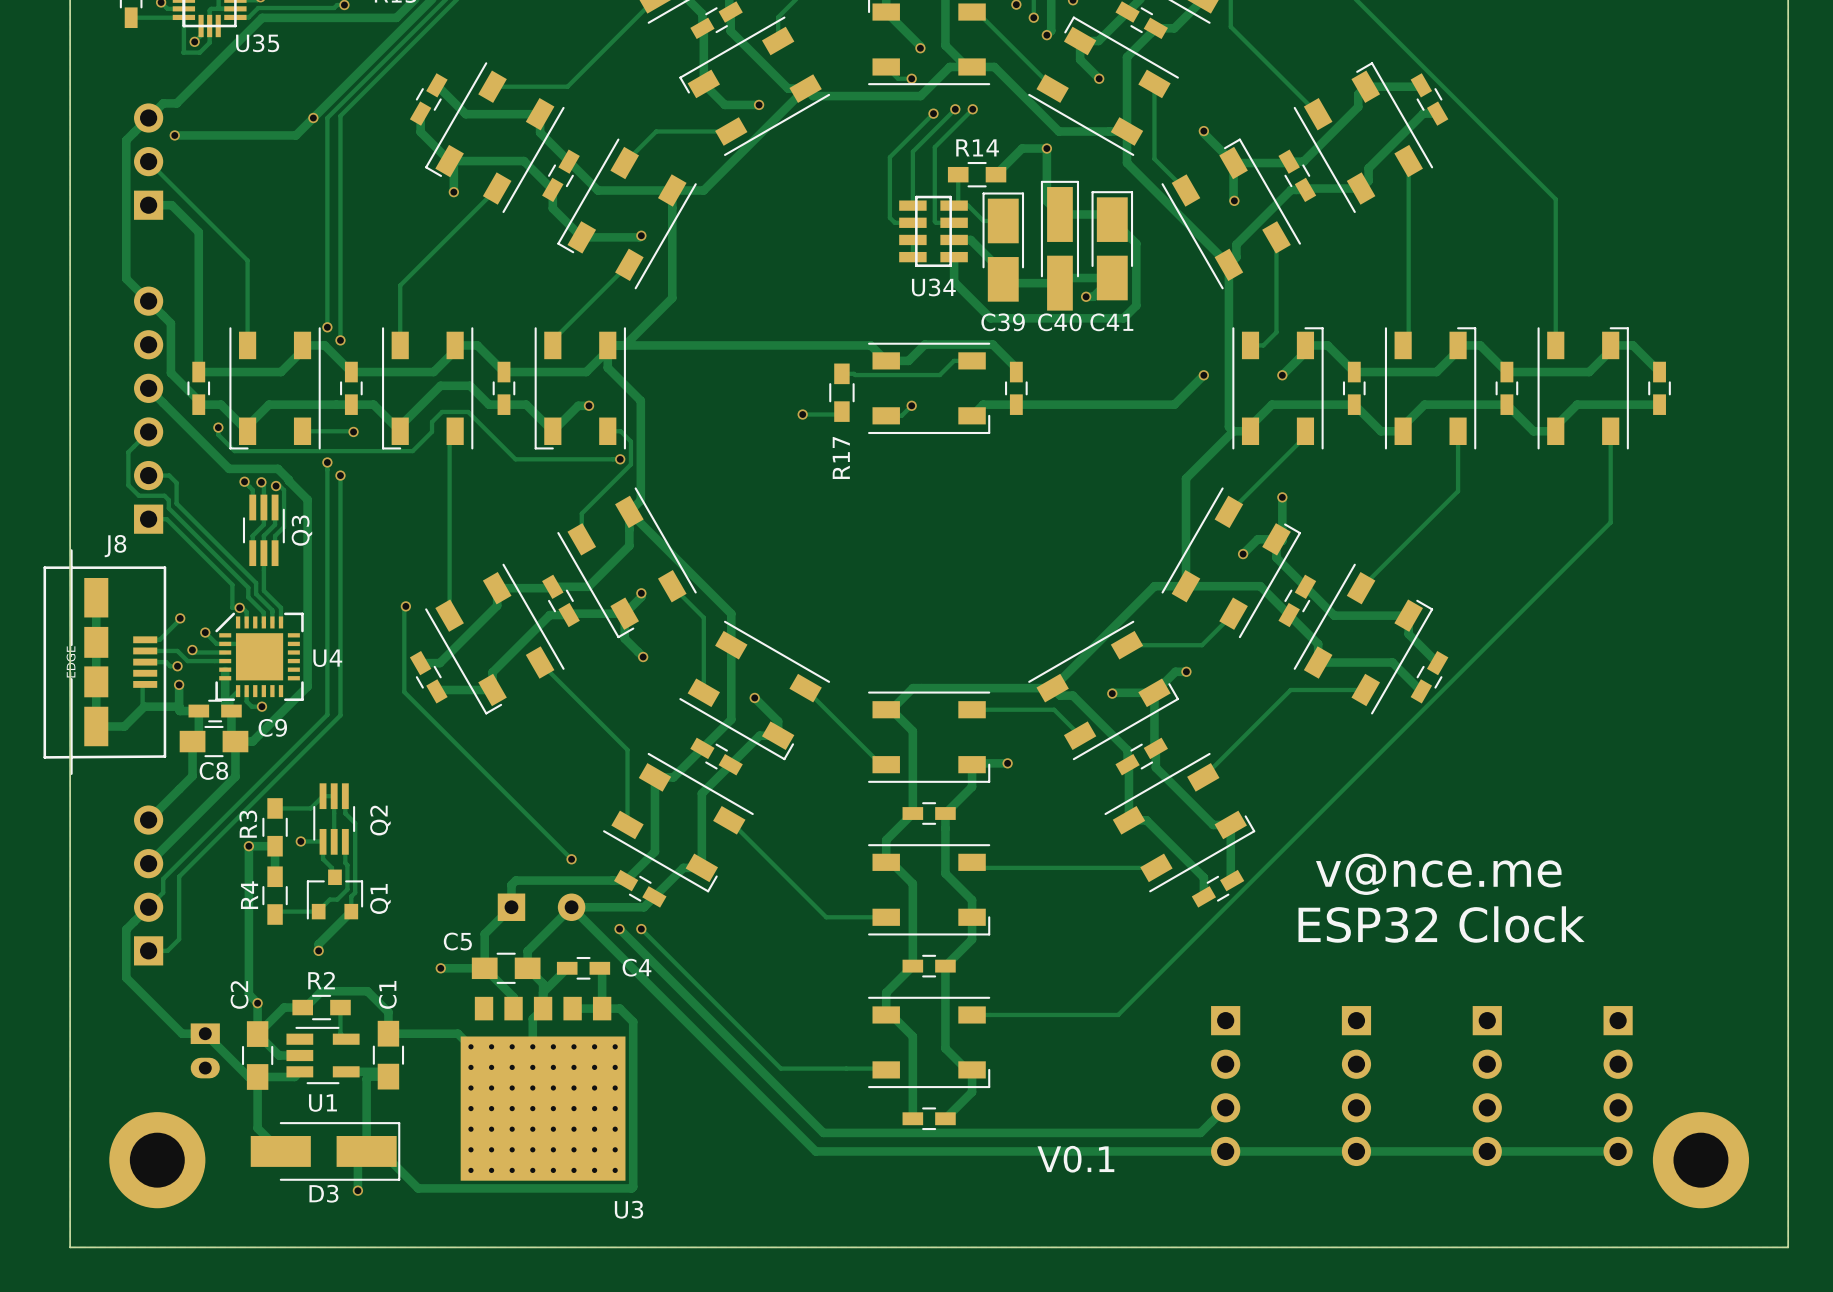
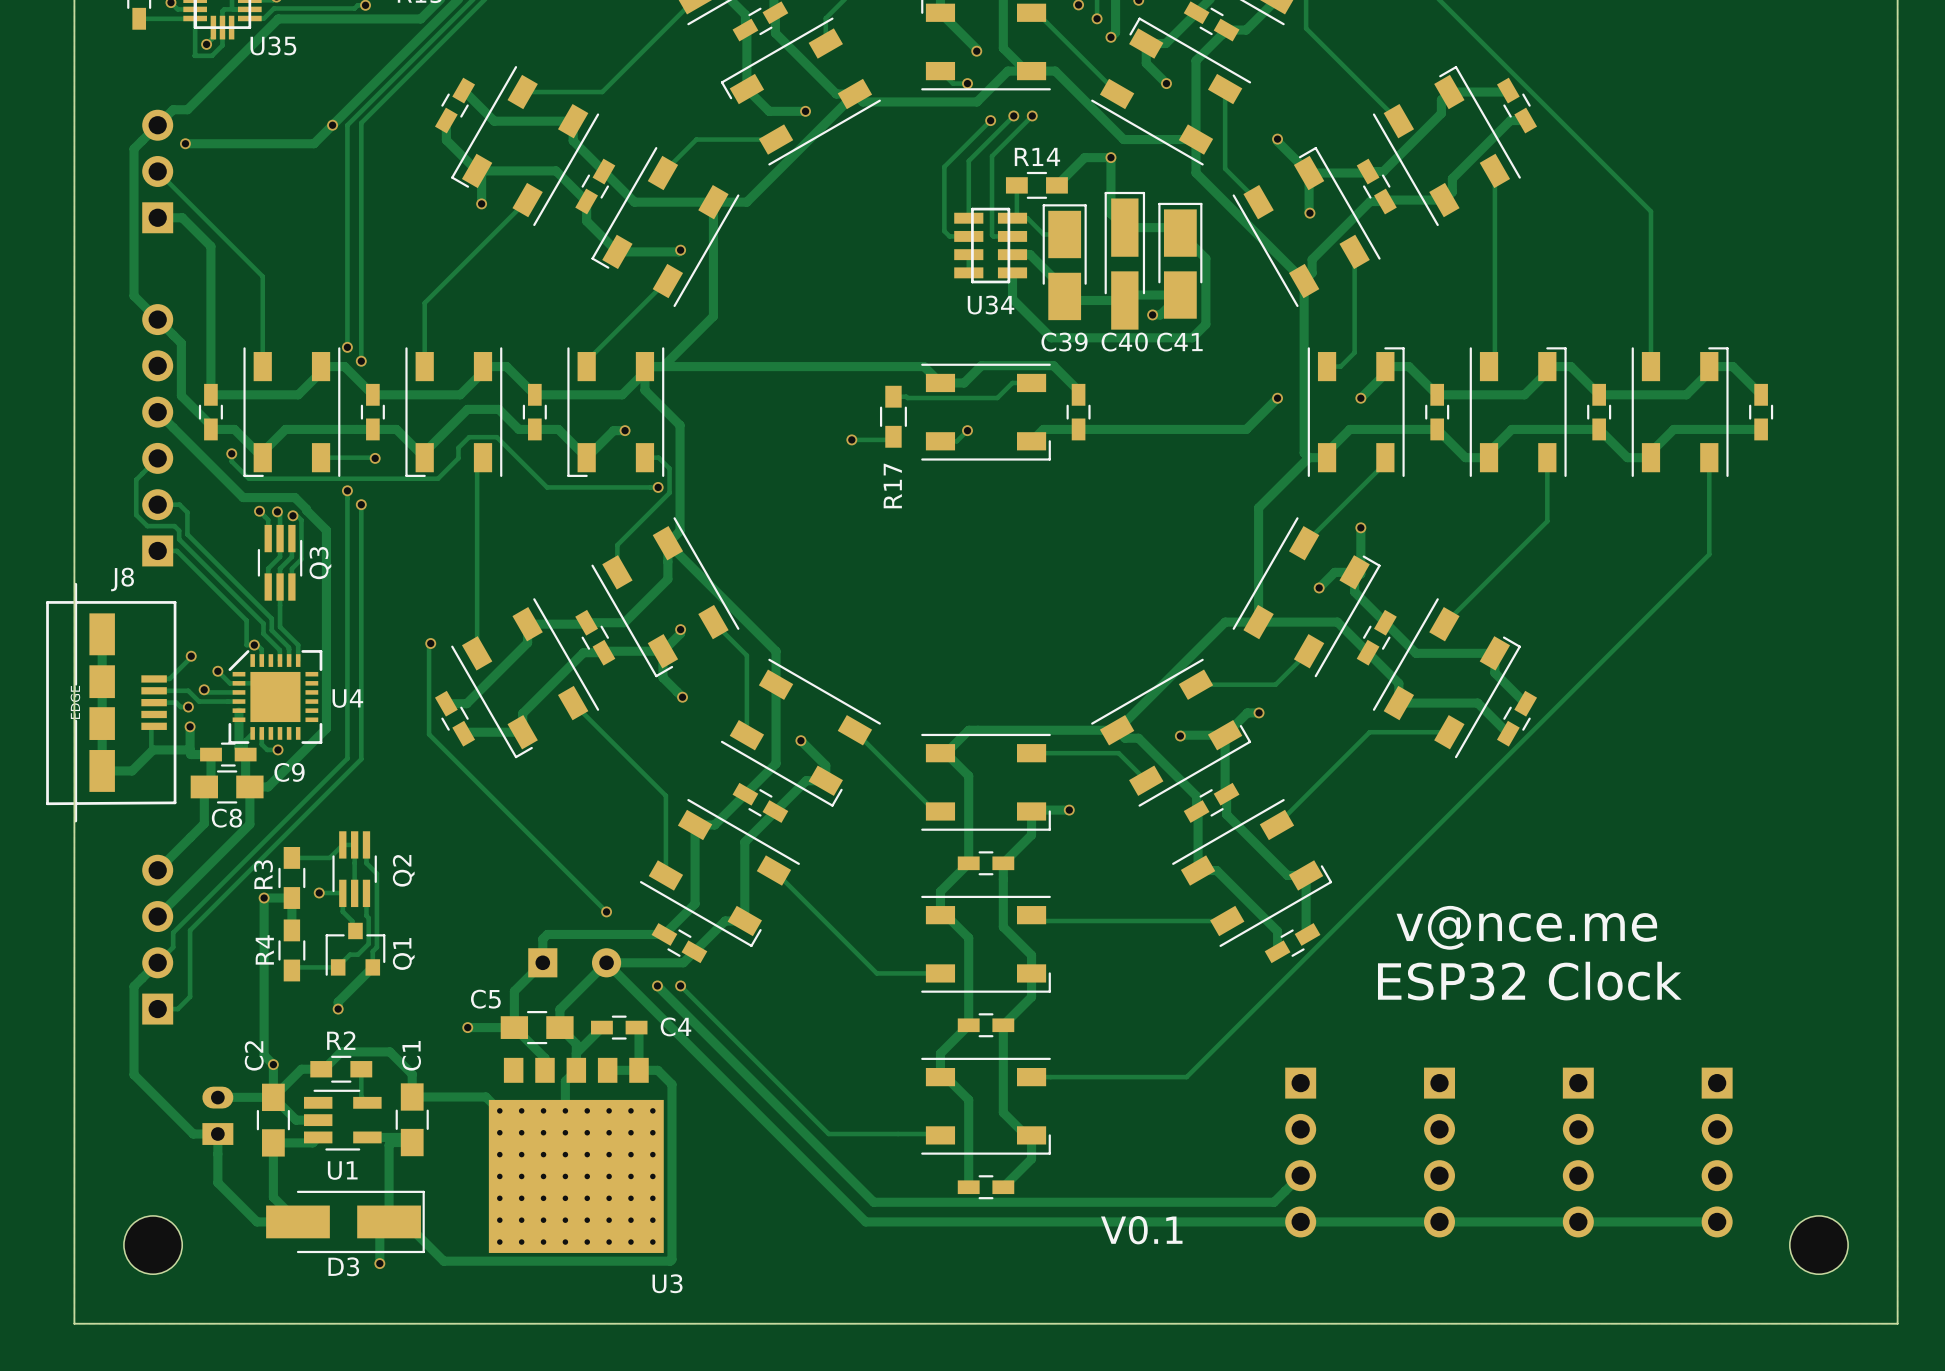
track: (126, 977) (182, 1033) (205, 1033) (248, 1076) (257, 1076) -> (134, 1037) (134, 1074) (193, 1134) (217, 1134) (217, 1182) (256, 1221) (297, 1221)
track: none -> (218, 1097) (273, 1097)
part rotation: 0° (205, 1050) -> 180° (217, 1115)
part: (157, 1160) -> none
part: (1700, 1160) -> none
part: none -> (153, 1245)
part: none -> (1818, 1245)

